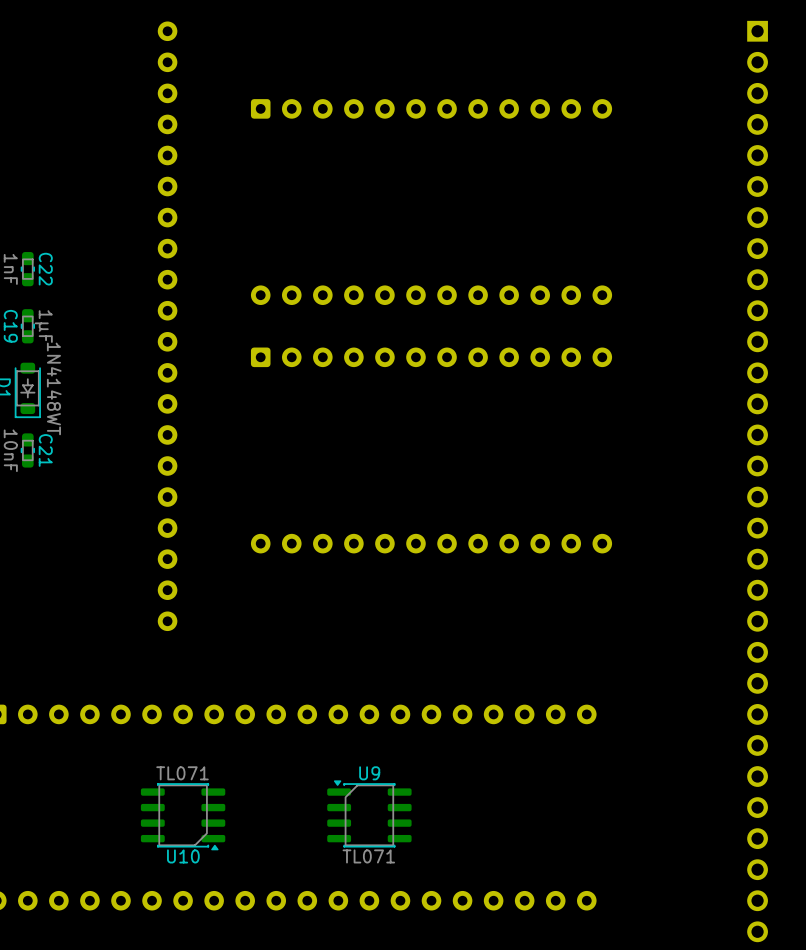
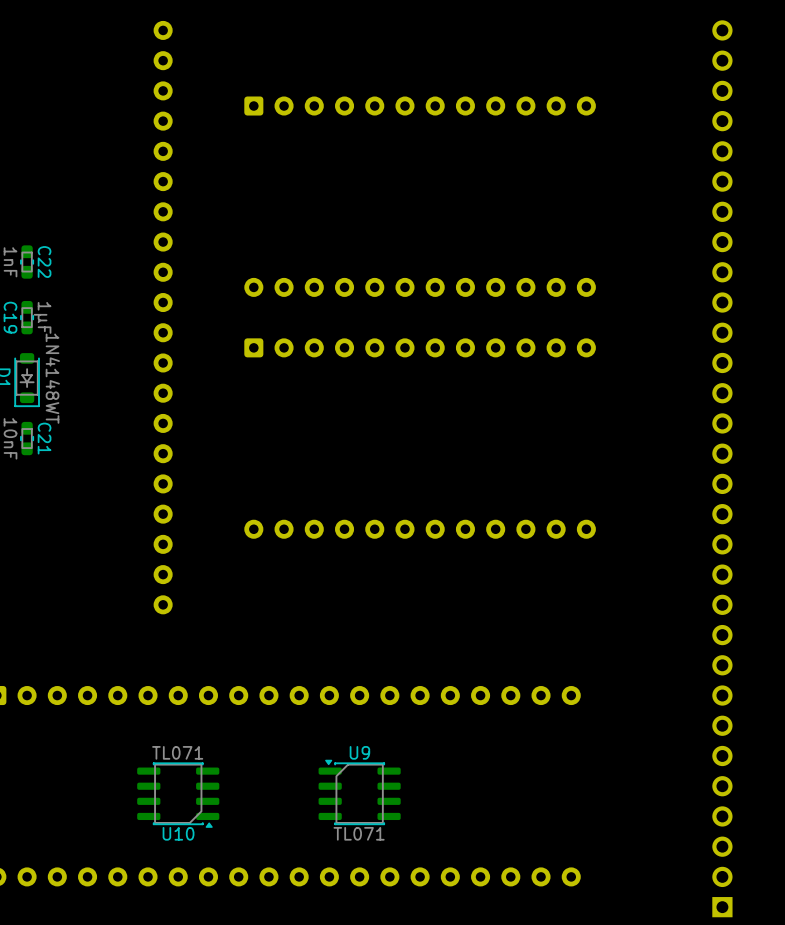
part rotation: 0° (757, 481) -> 180° (722, 468)

